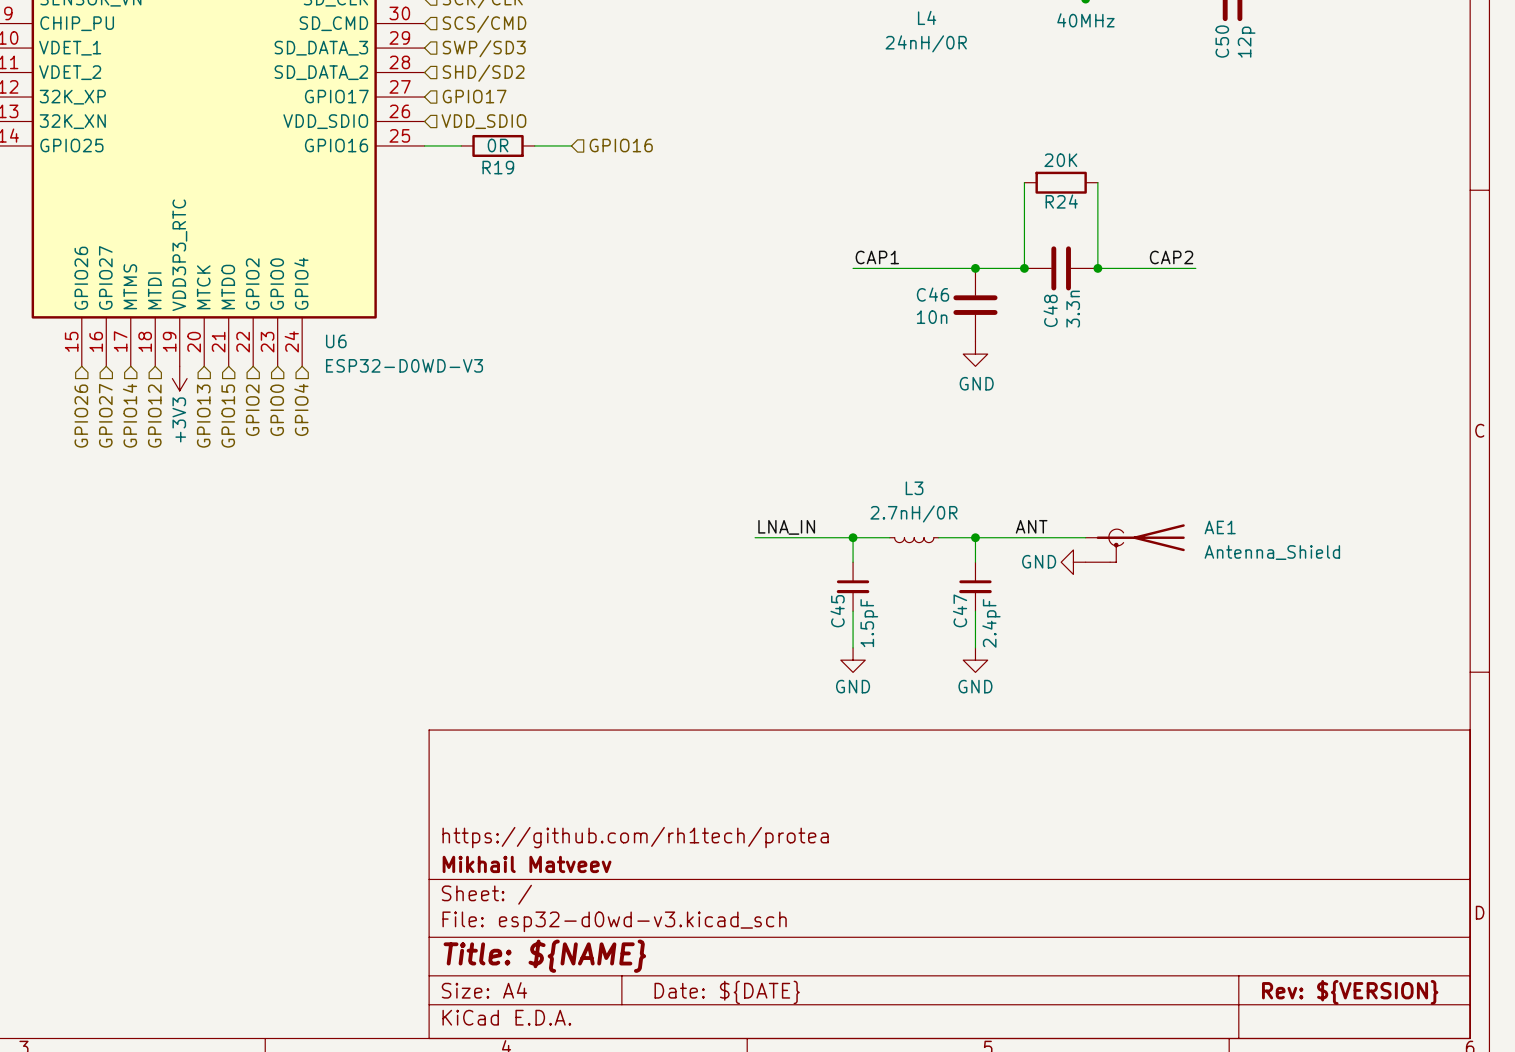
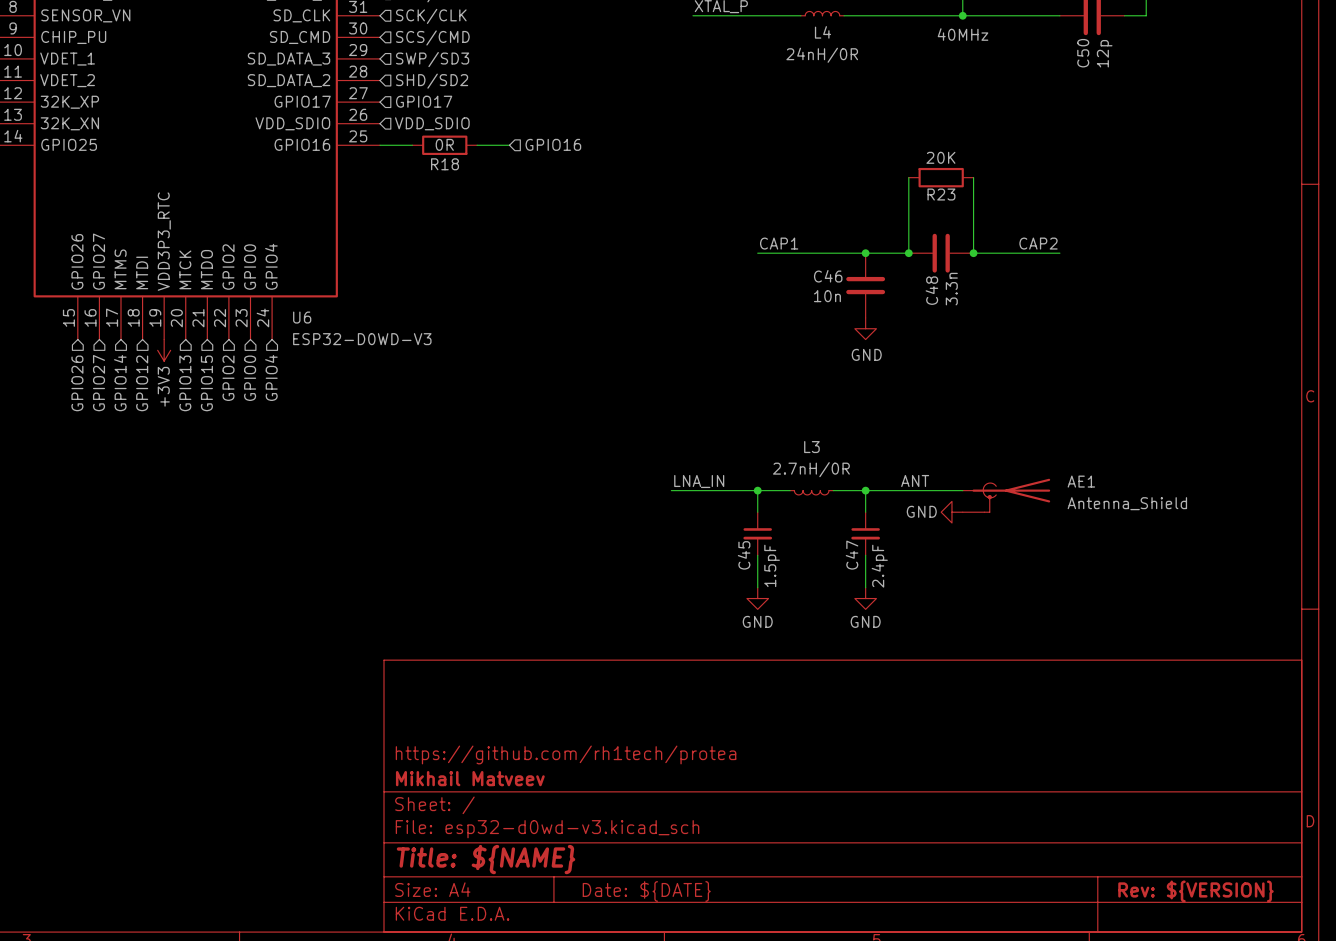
R19 name: R19 (498, 167) -> R18 (445, 164)
R24 name: R24 (1061, 201) -> R23 (941, 194)

